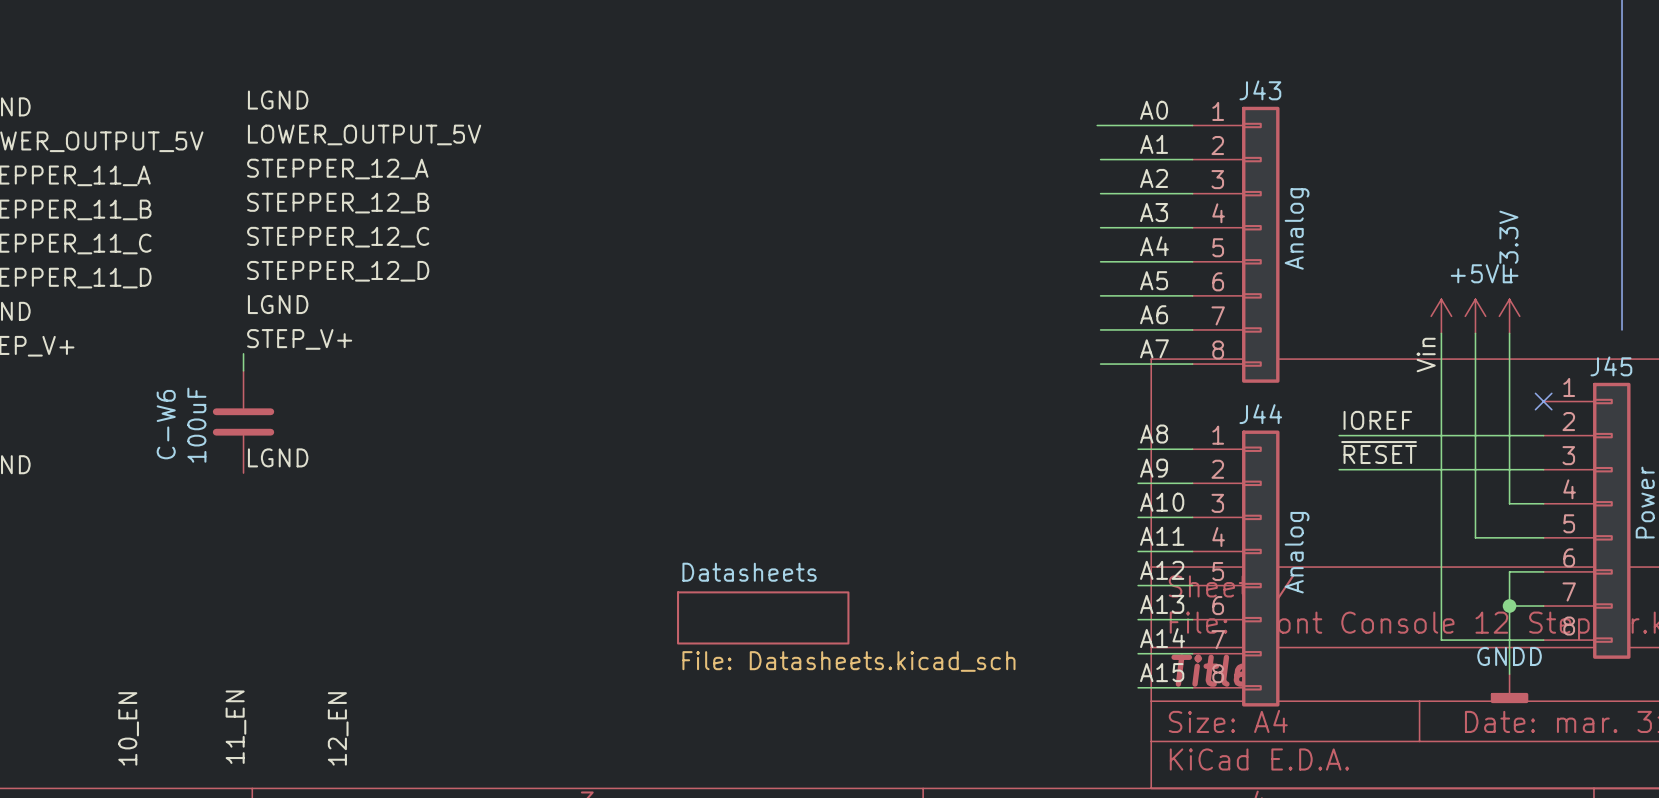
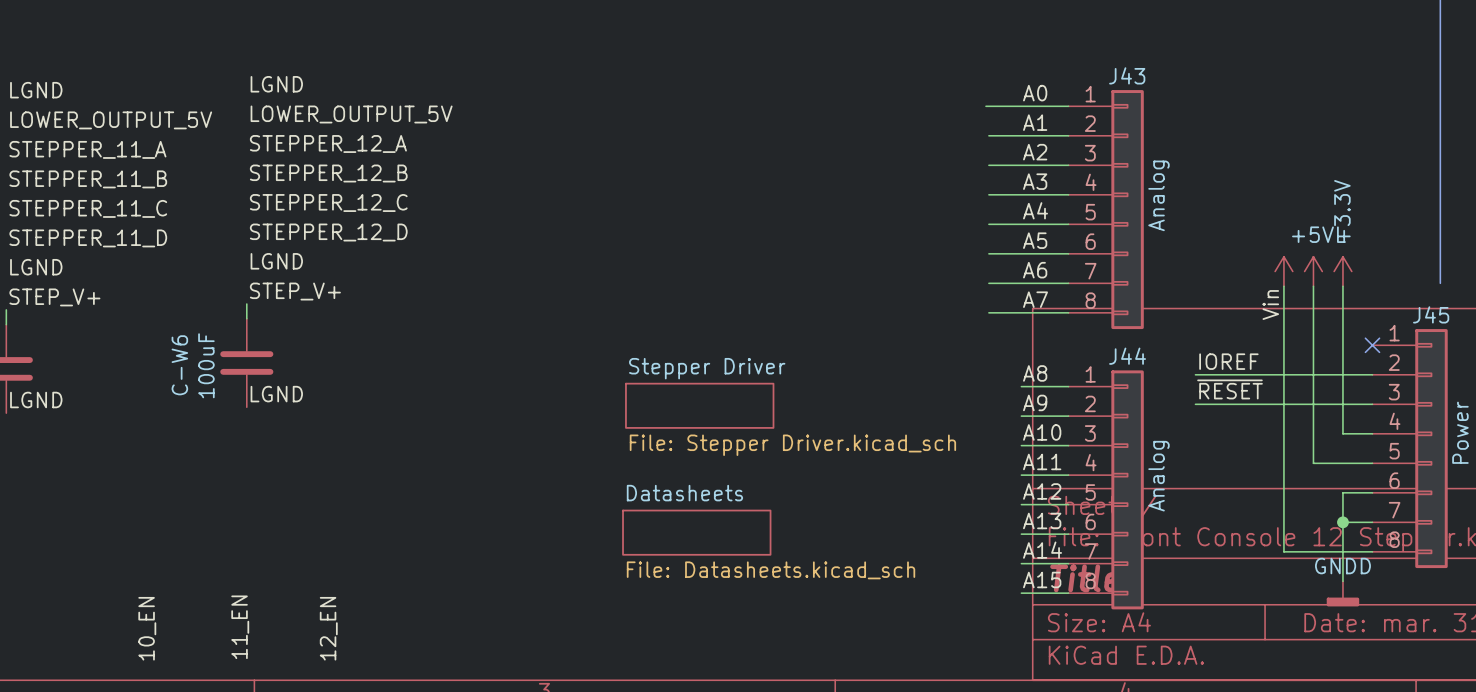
sheet Stepper Driver: none -> File: Stepper Driver.kicad_sch (699, 405)

